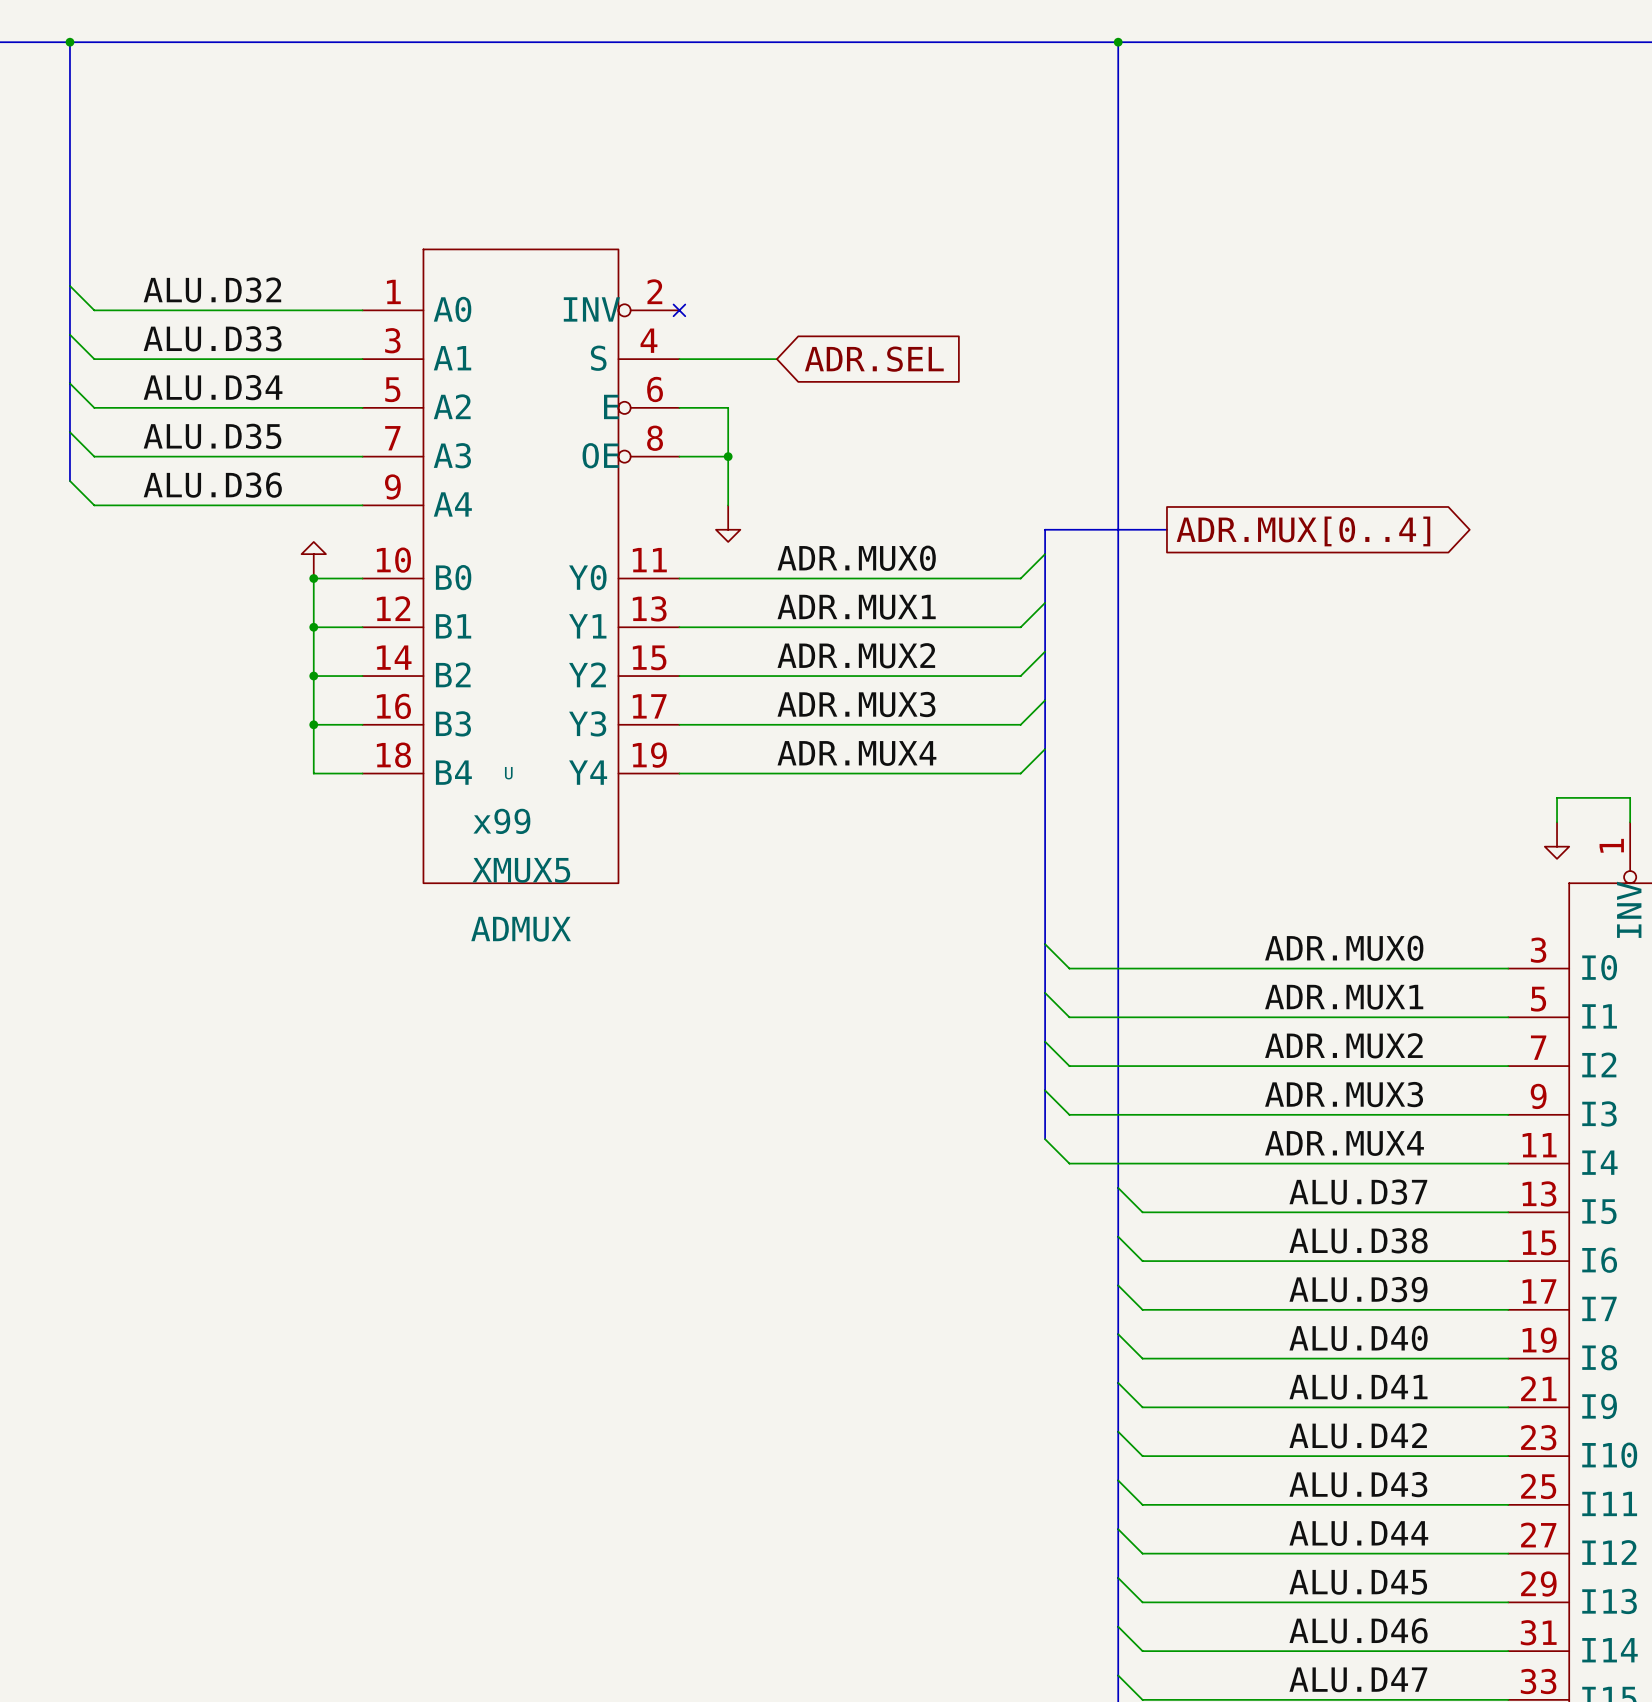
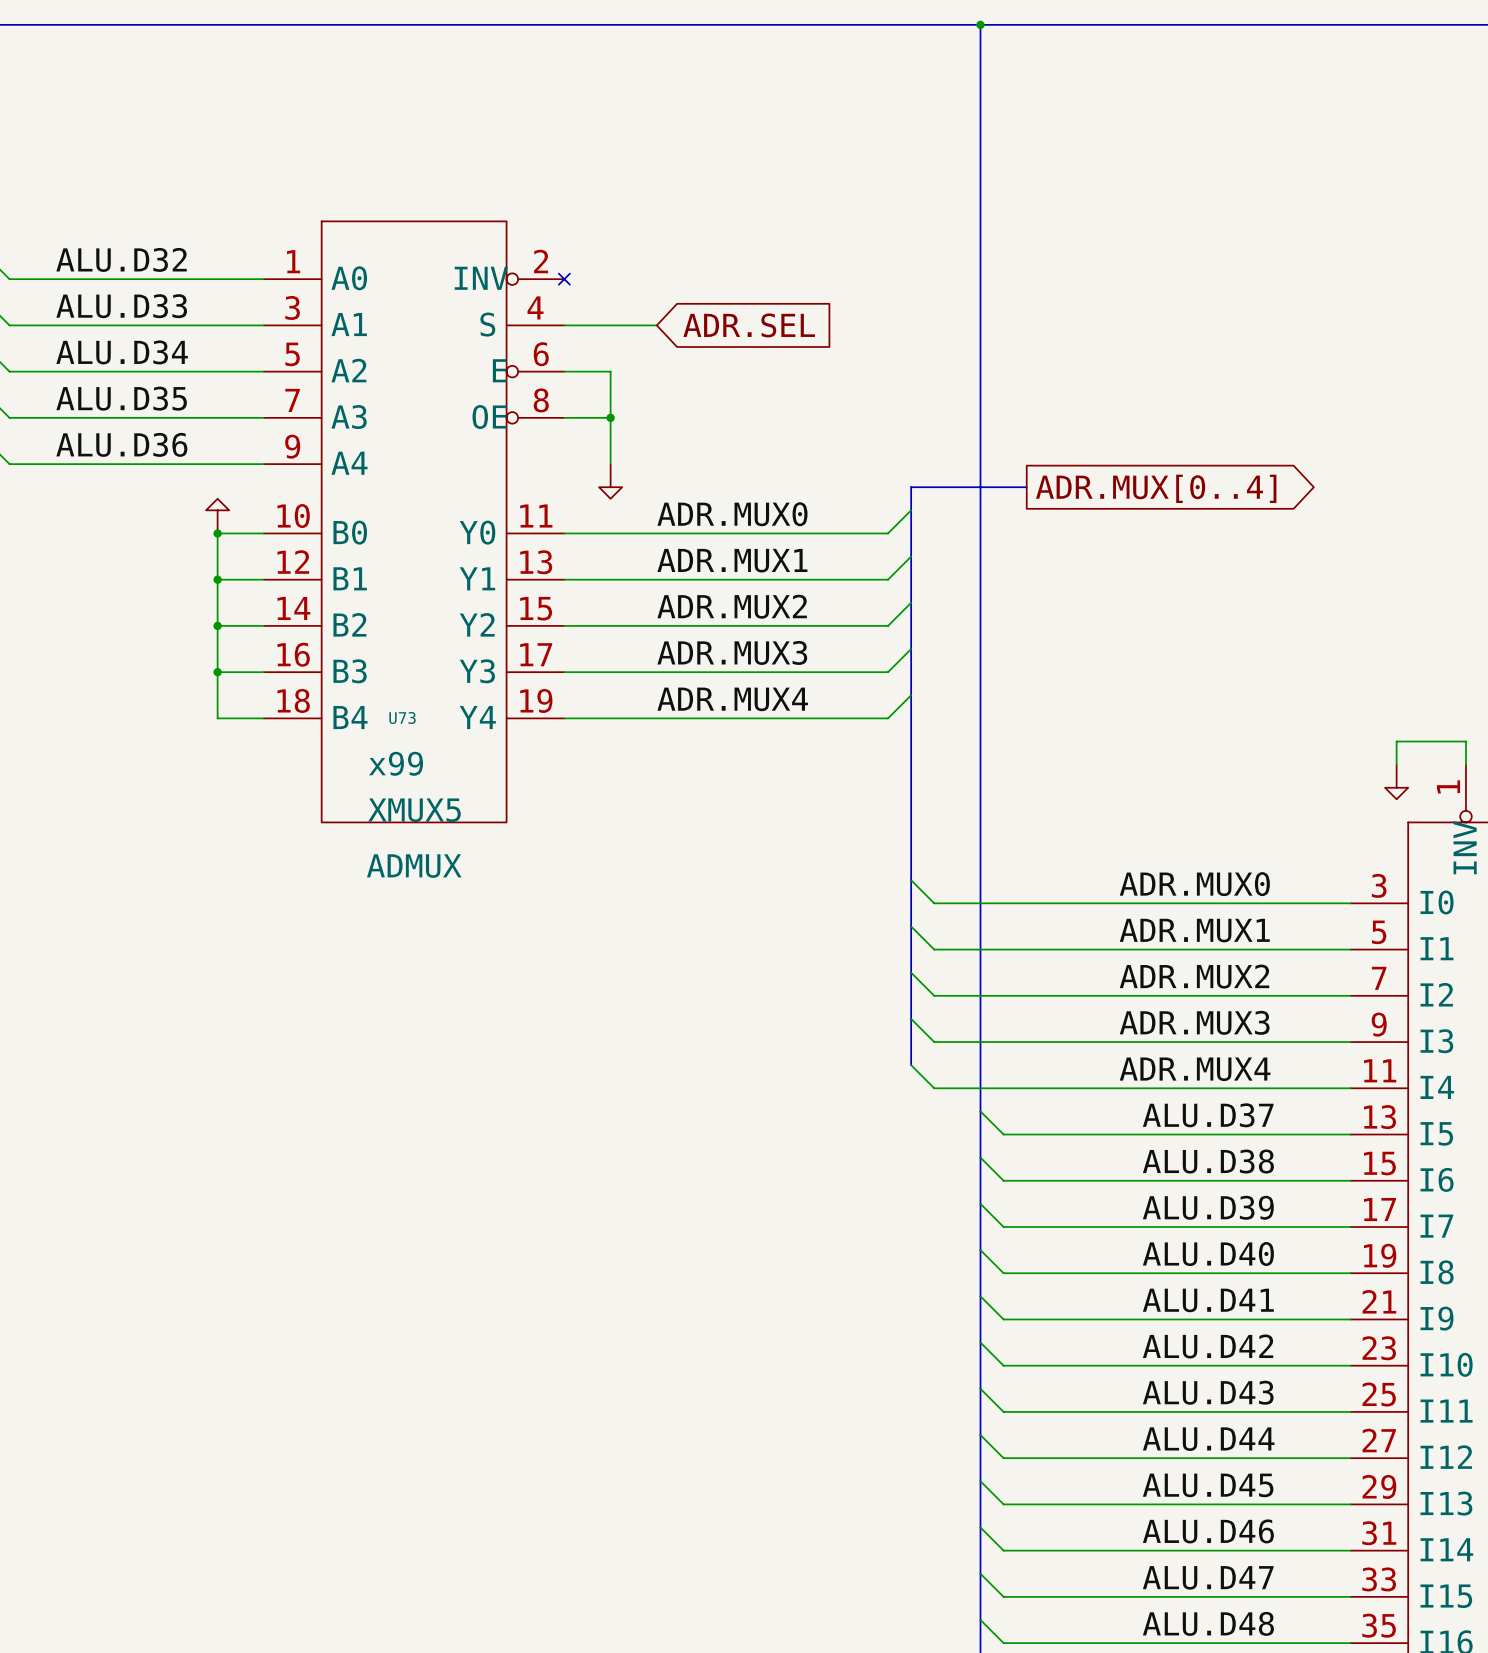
U name: U (508, 773) -> U73 (402, 717)

